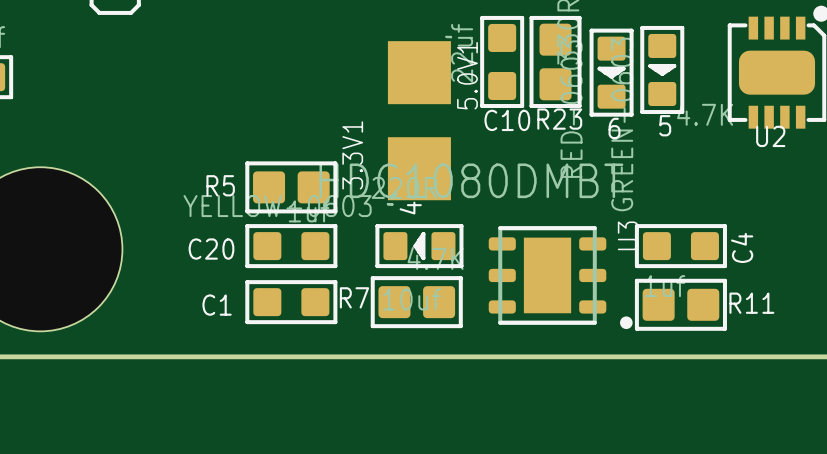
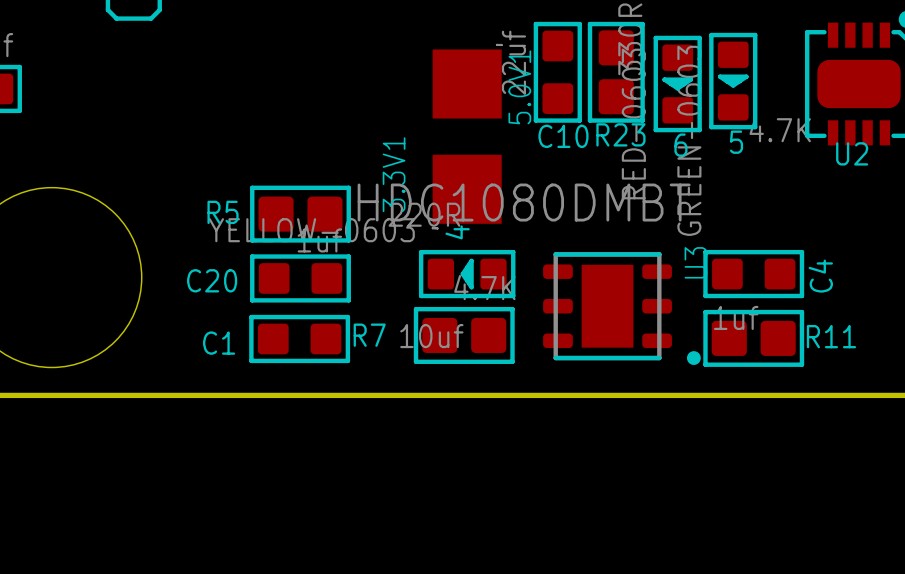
R5 position: (291, 187) -> (300, 214)
C1 position: (291, 246) -> (300, 278)
R7 name position: R7 (354, 297) -> R7 (369, 335)
C20 position: (291, 302) -> (299, 338)

